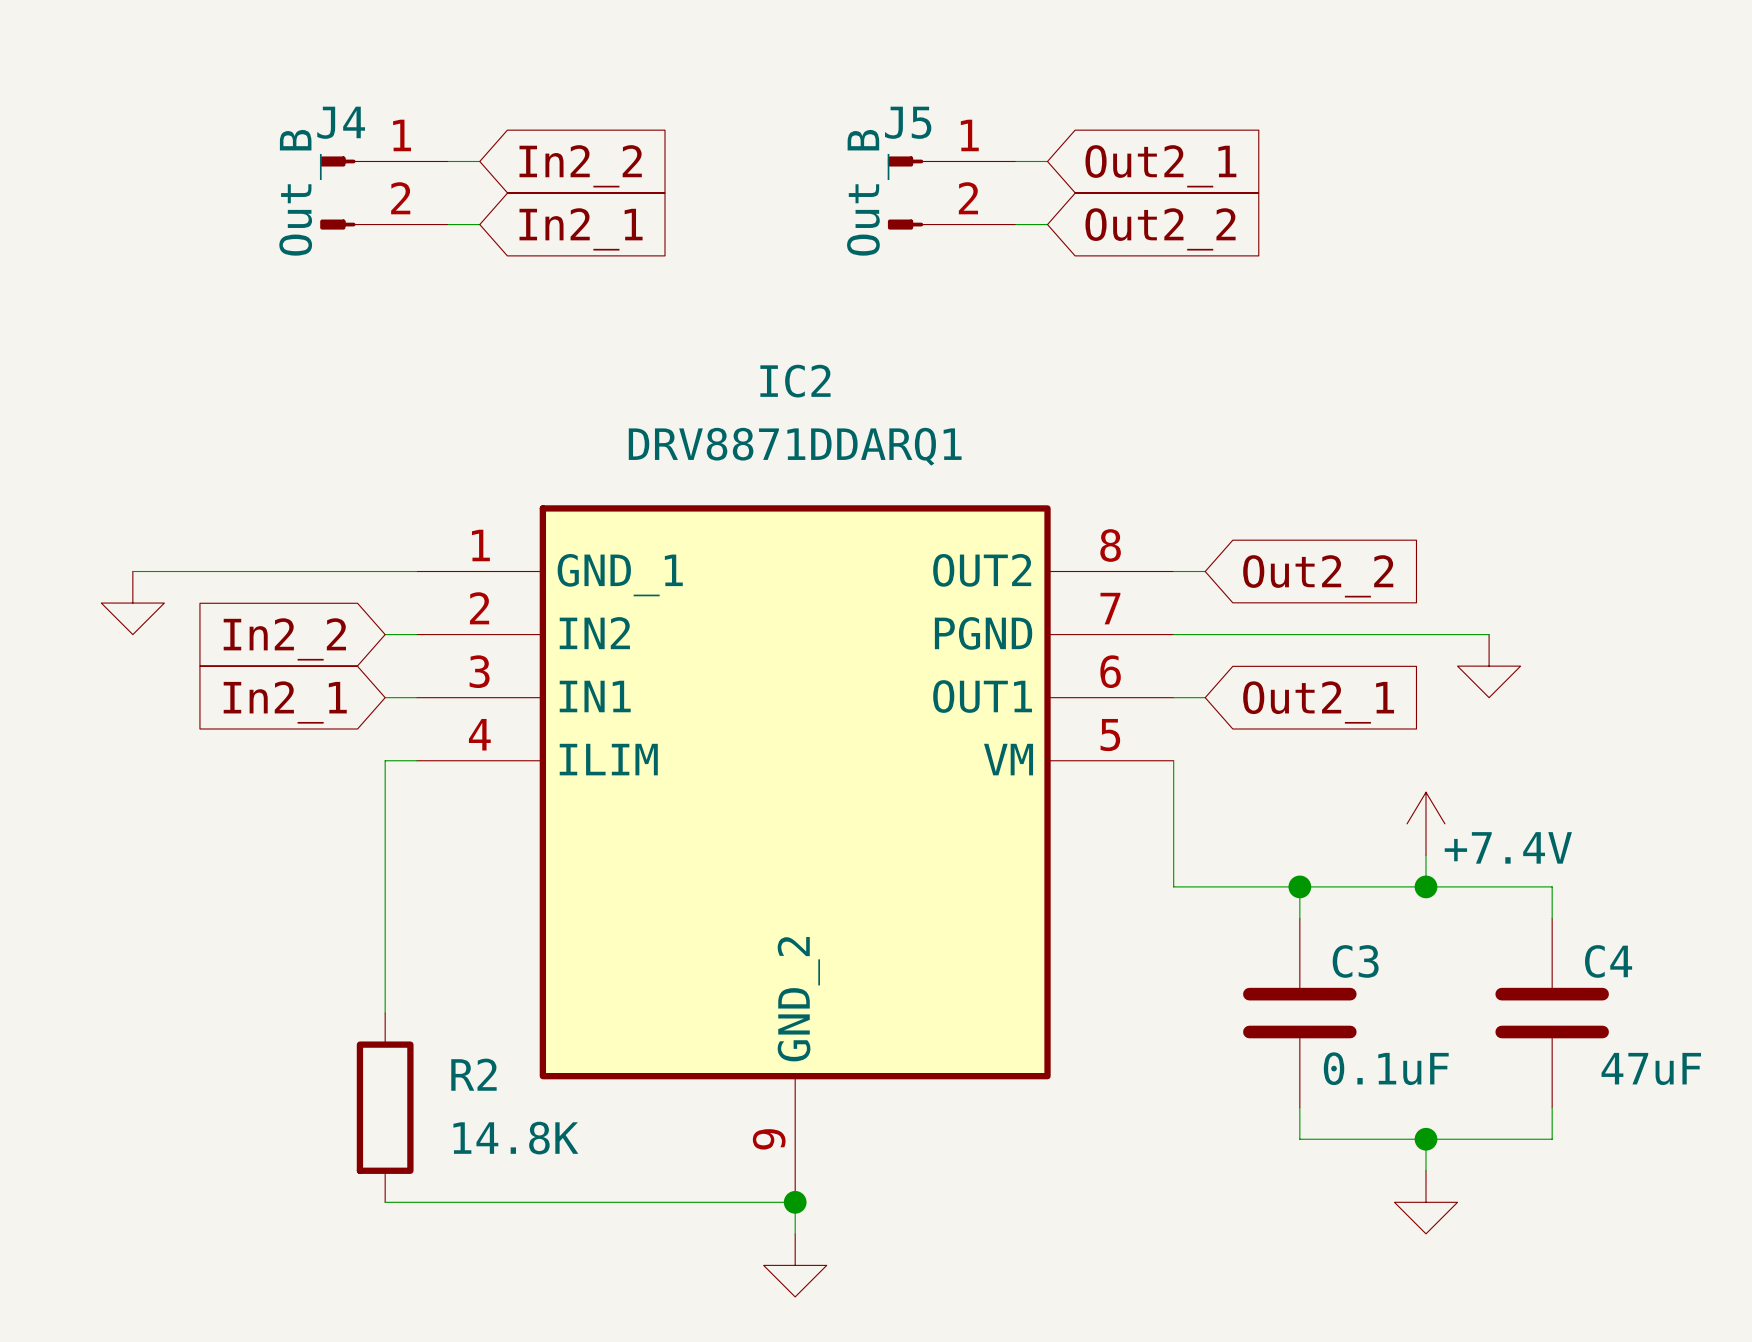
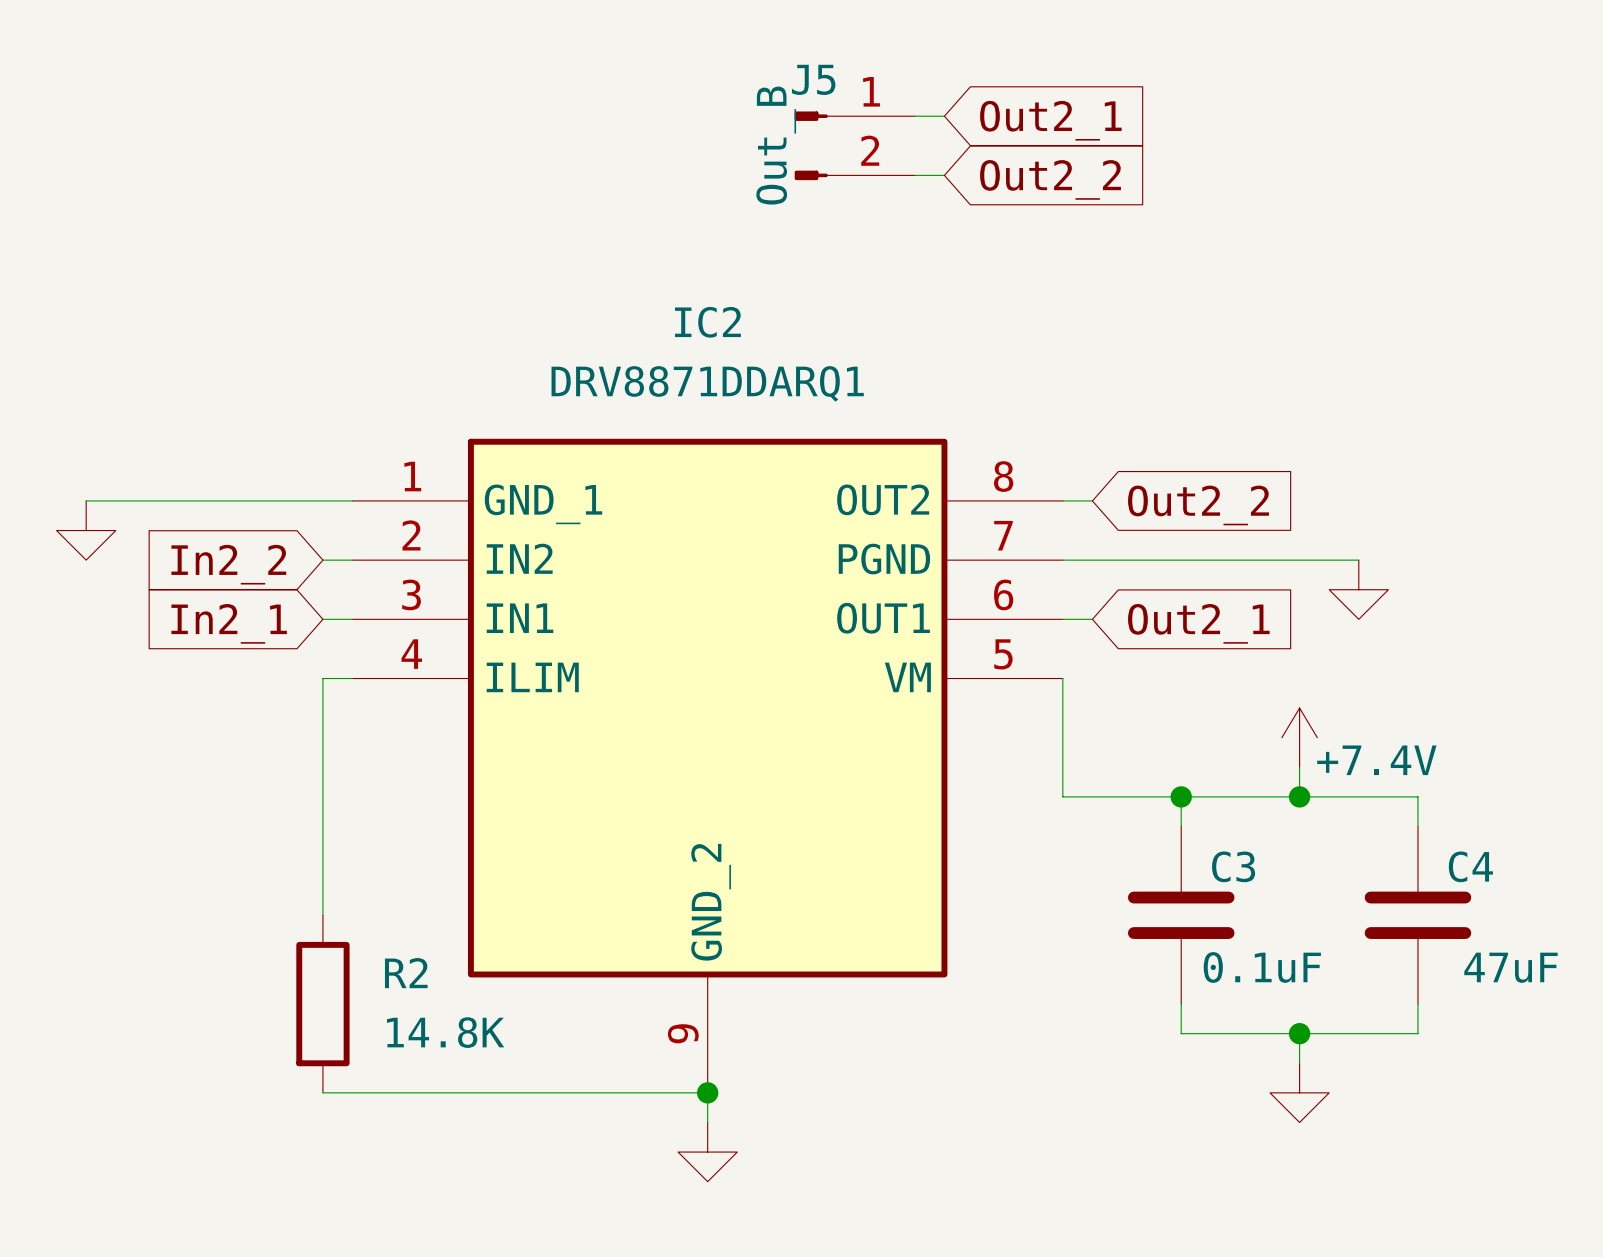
wire: (448, 161) (479, 161) -> none
global label: In2_2 (580, 166) -> none
J4: Out_B (384, 193) -> none
wire: (448, 224) (479, 224) -> none
global label: In2_1 (581, 229) -> none

